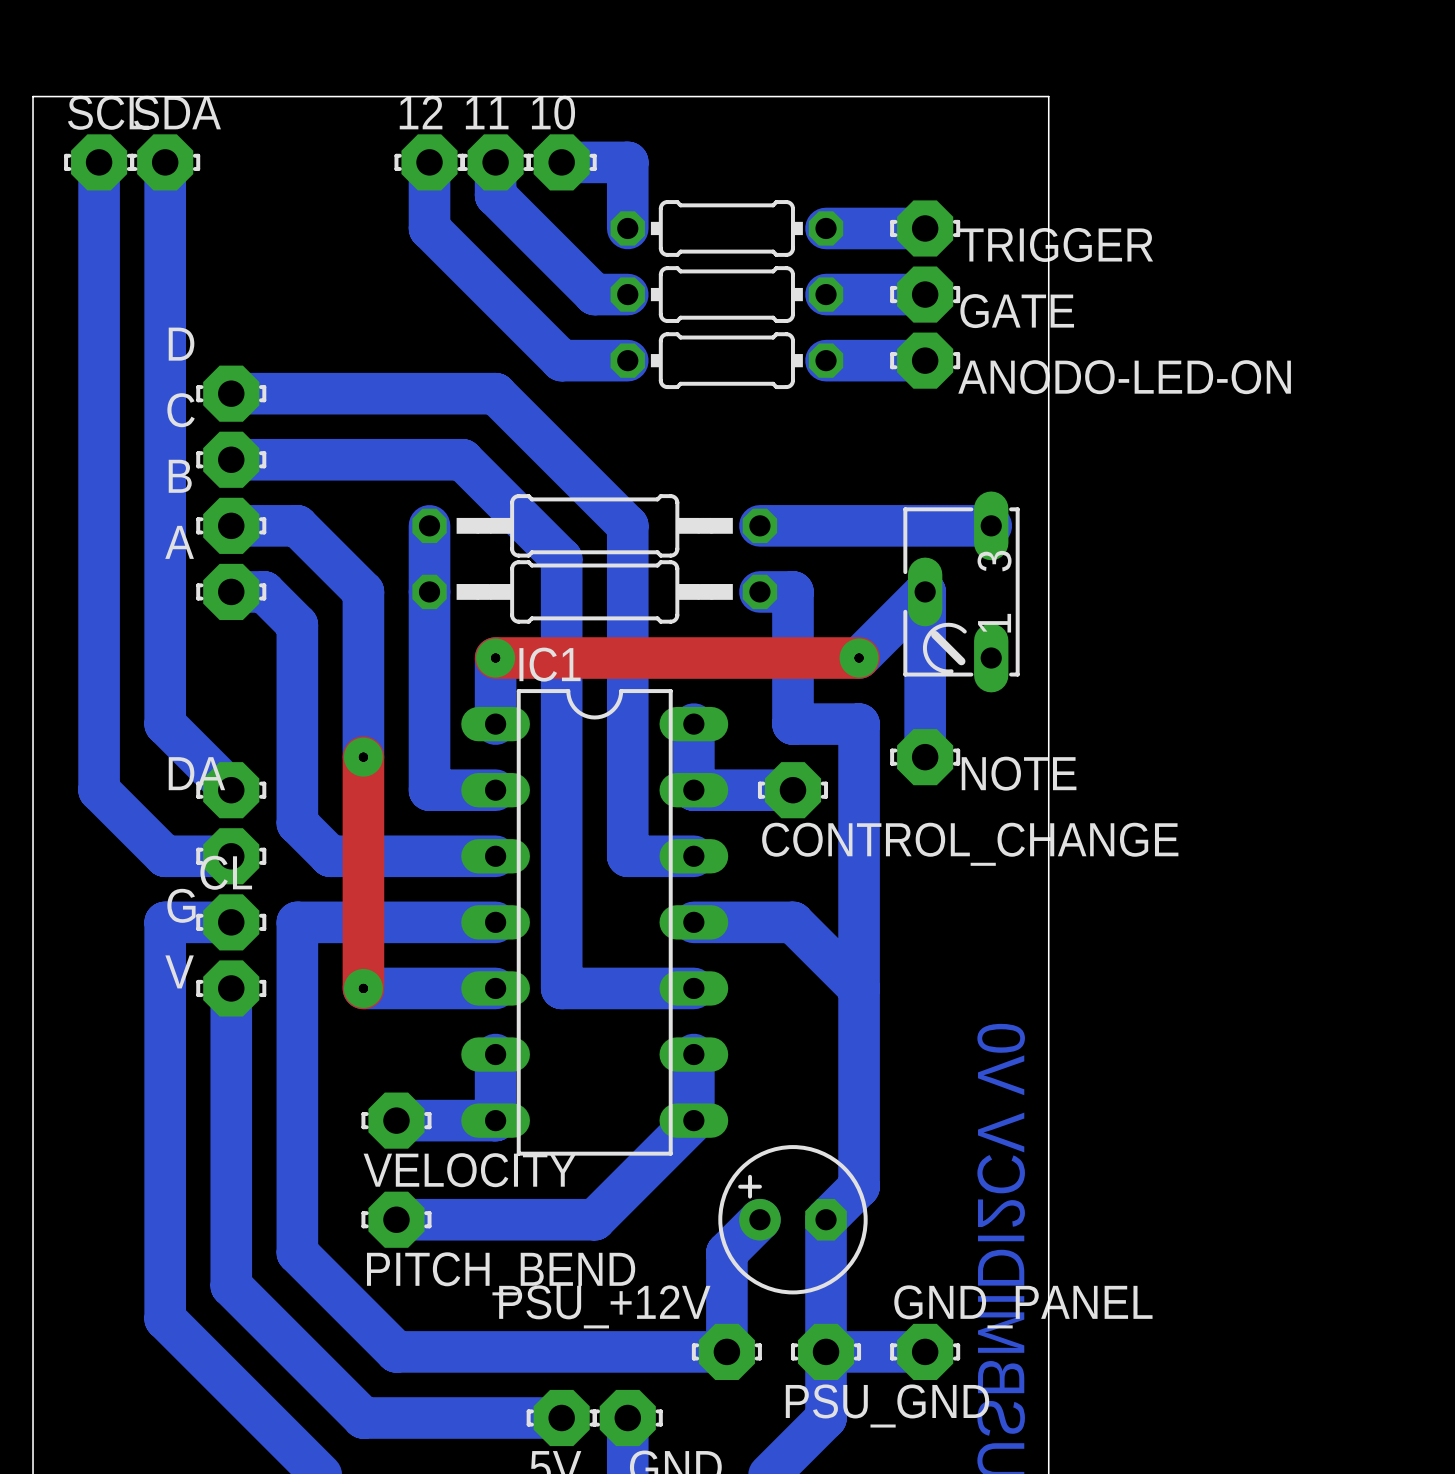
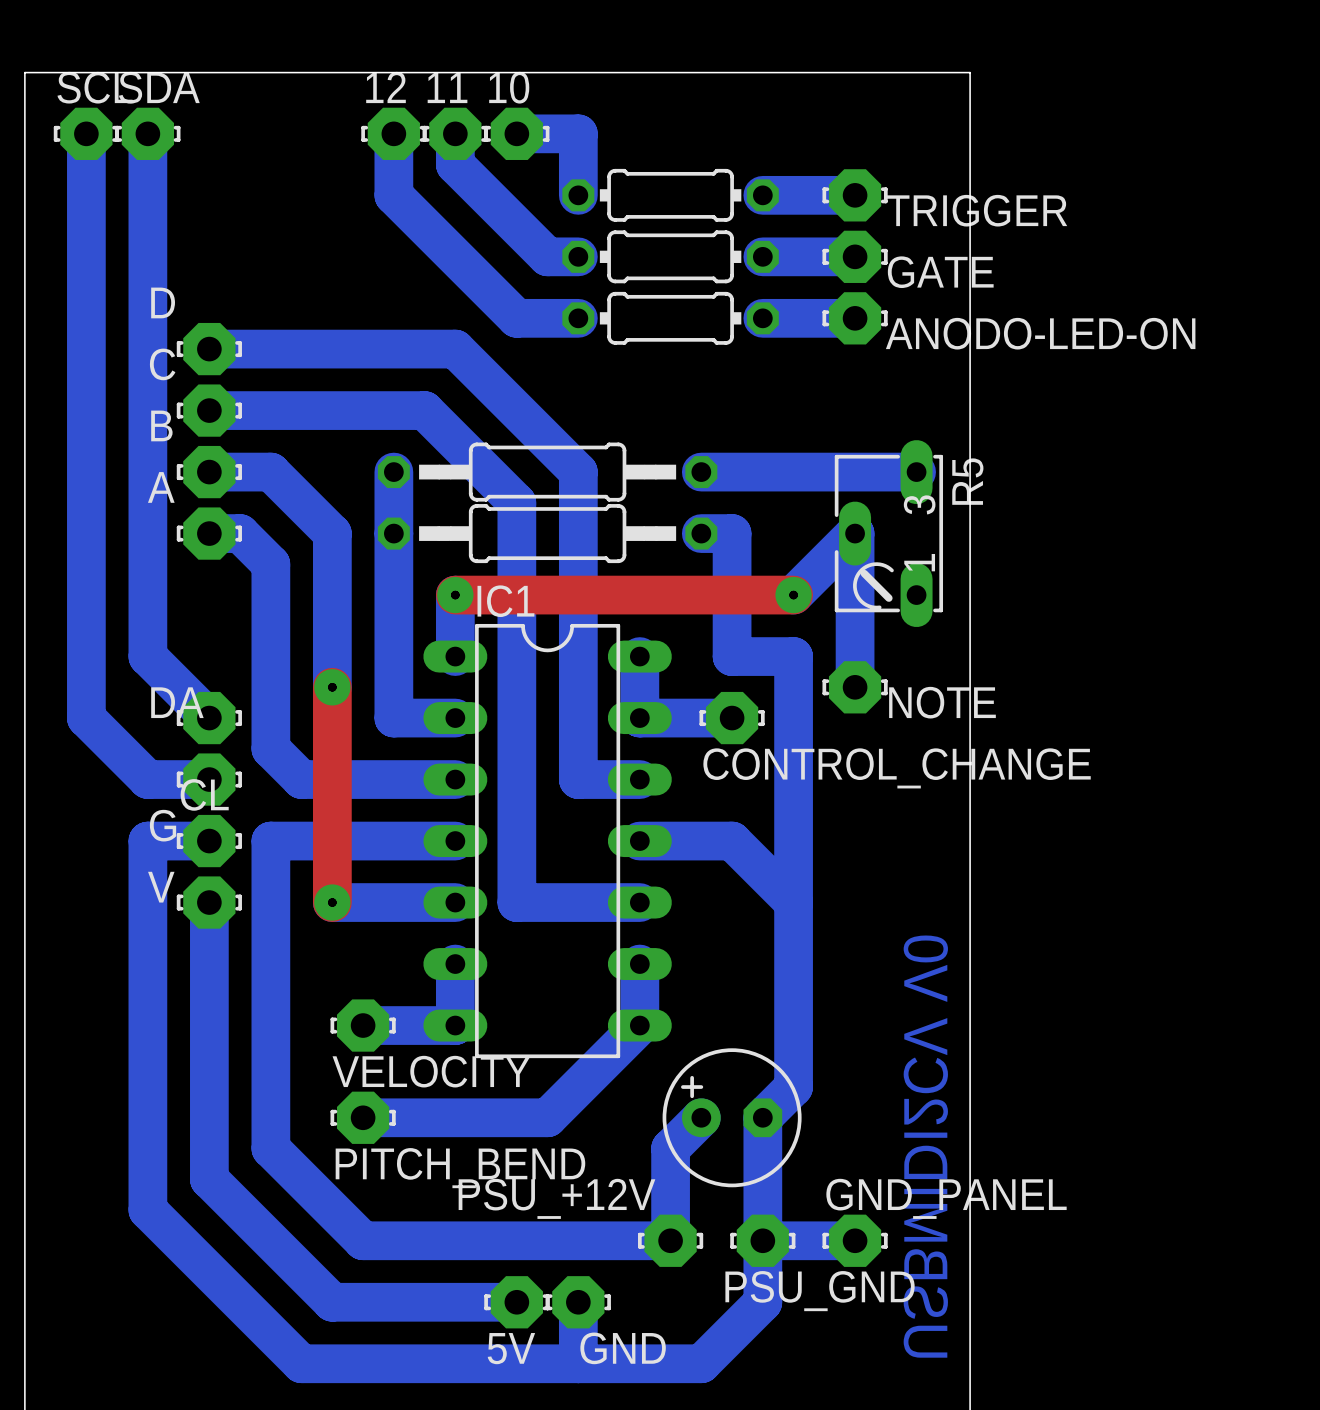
R5 name: none -> R5 (967, 481)

